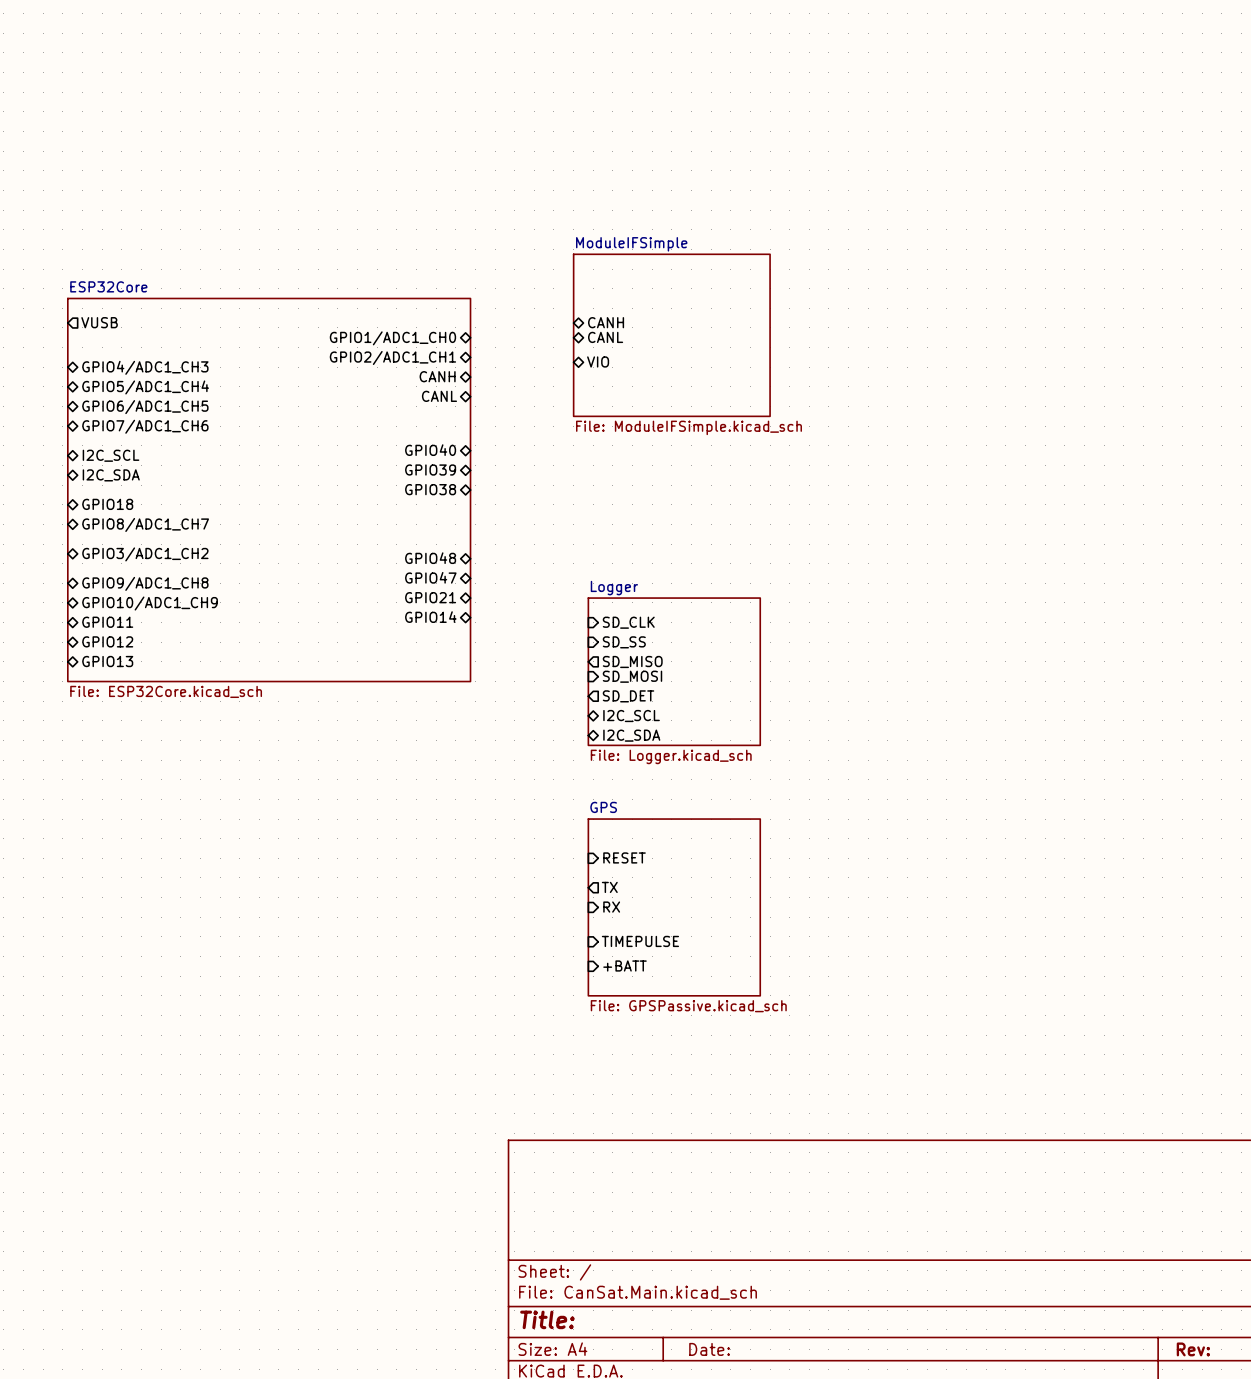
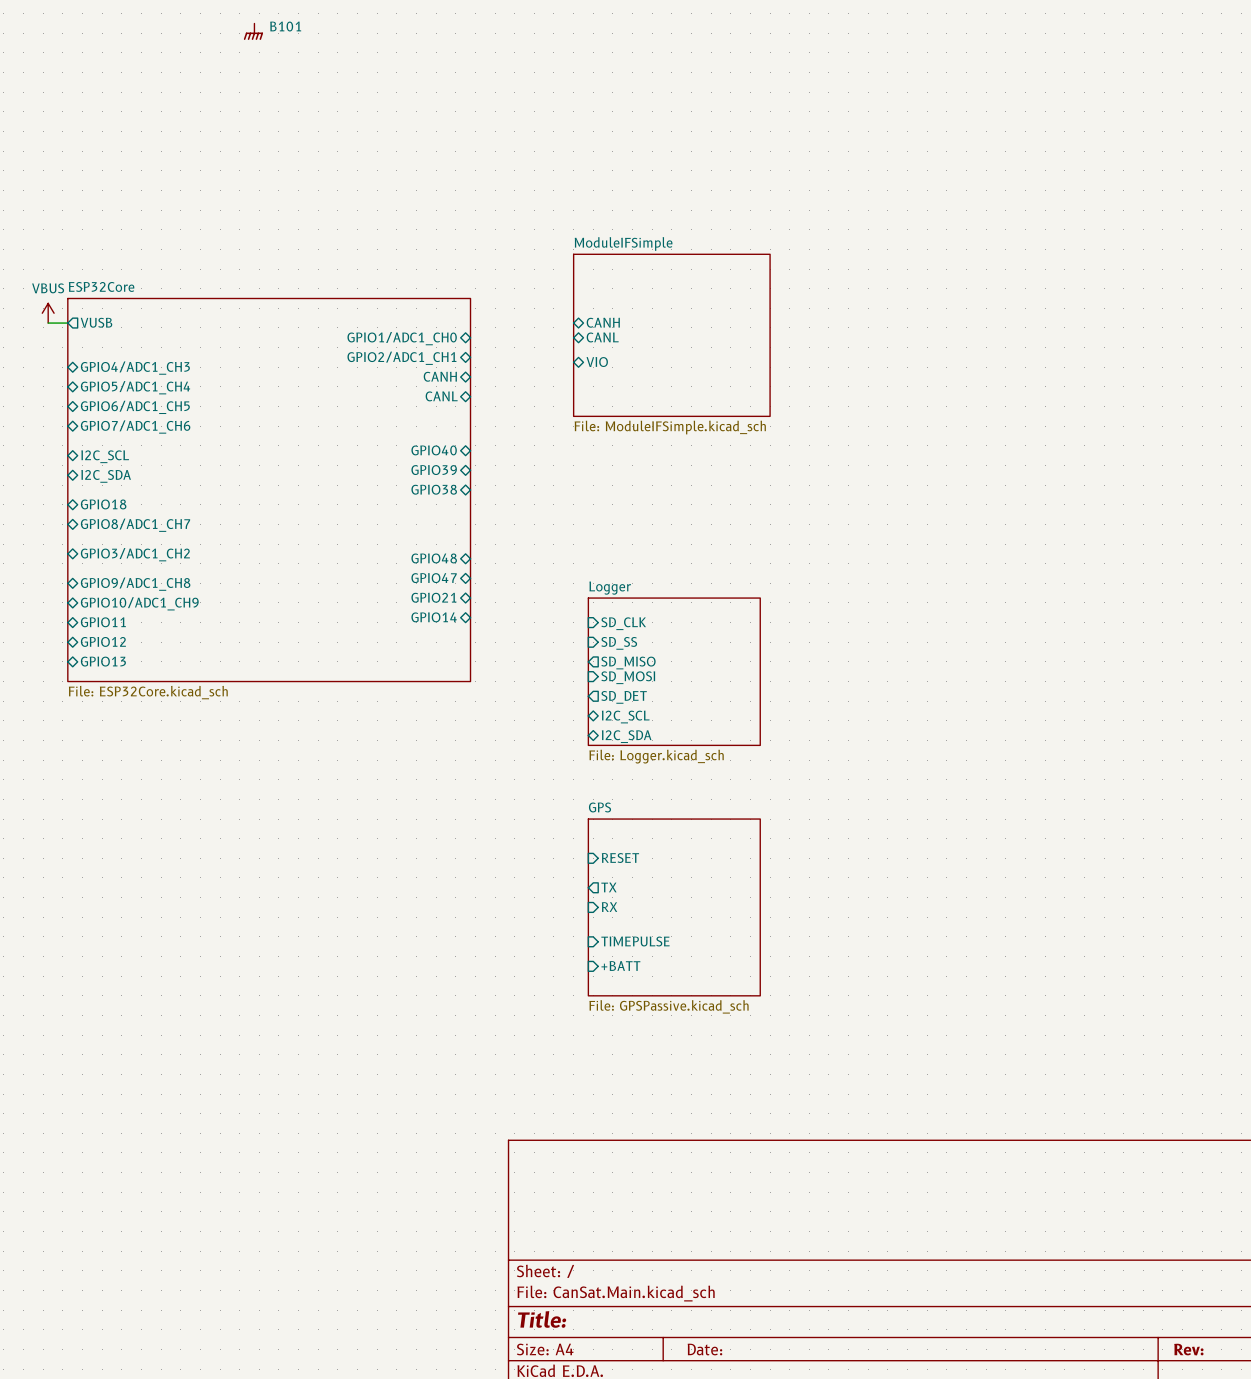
B101: none -> (253, 31)
power symbol: none -> VBUS (48, 313)
wire: none -> (48, 323) (67, 323)

